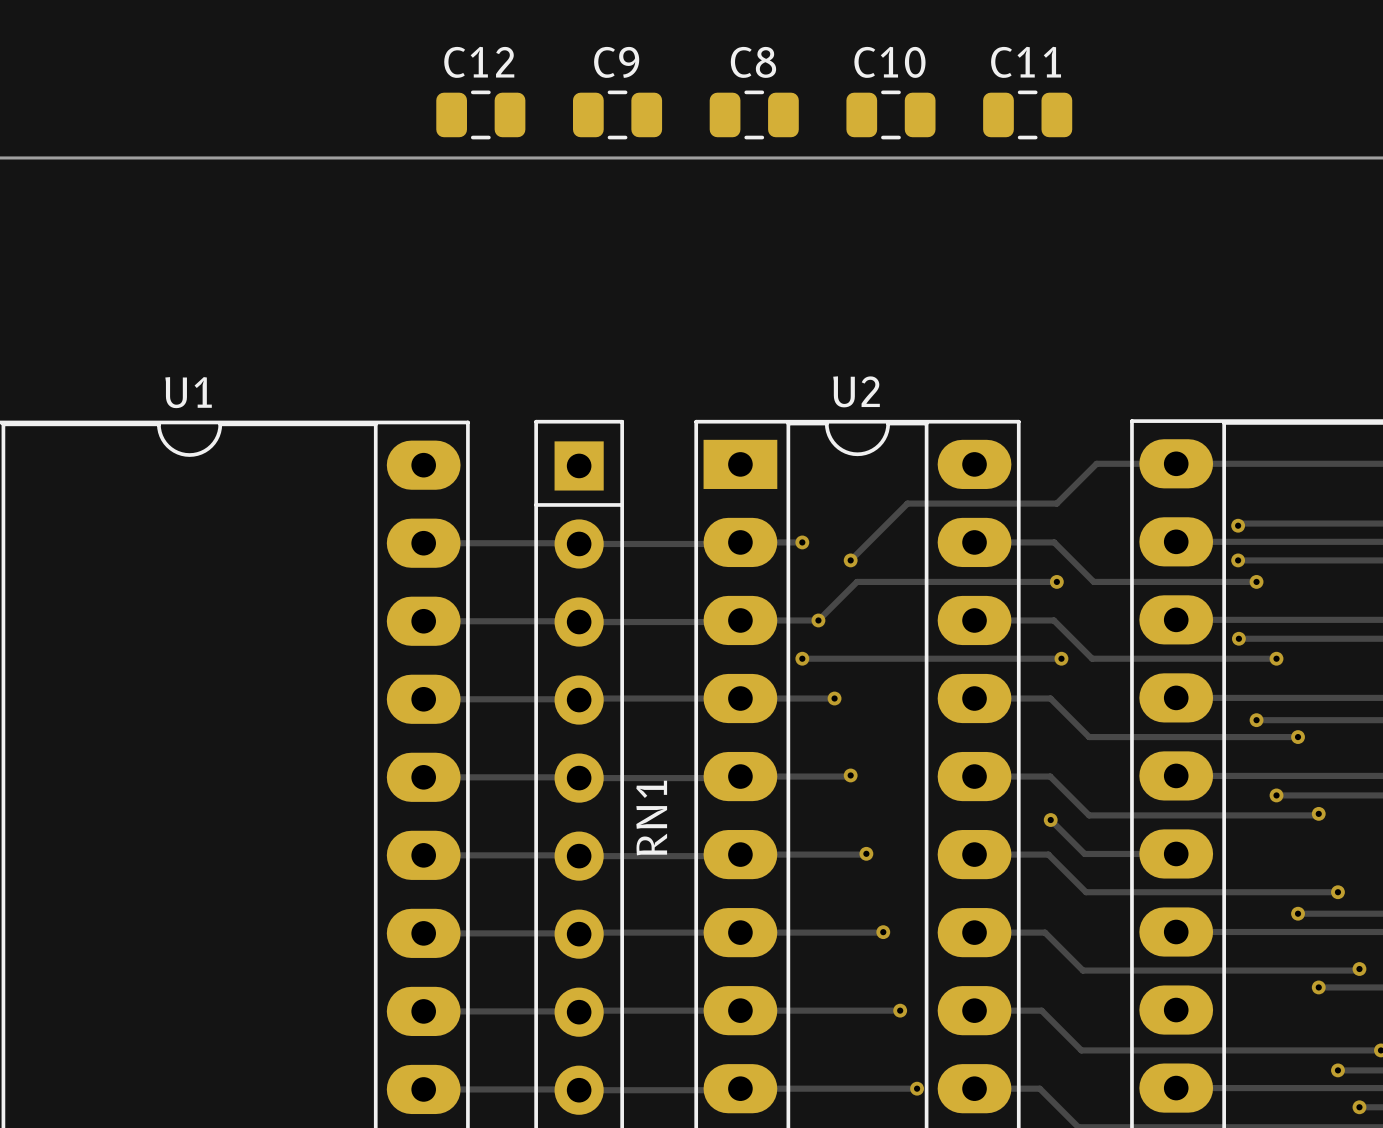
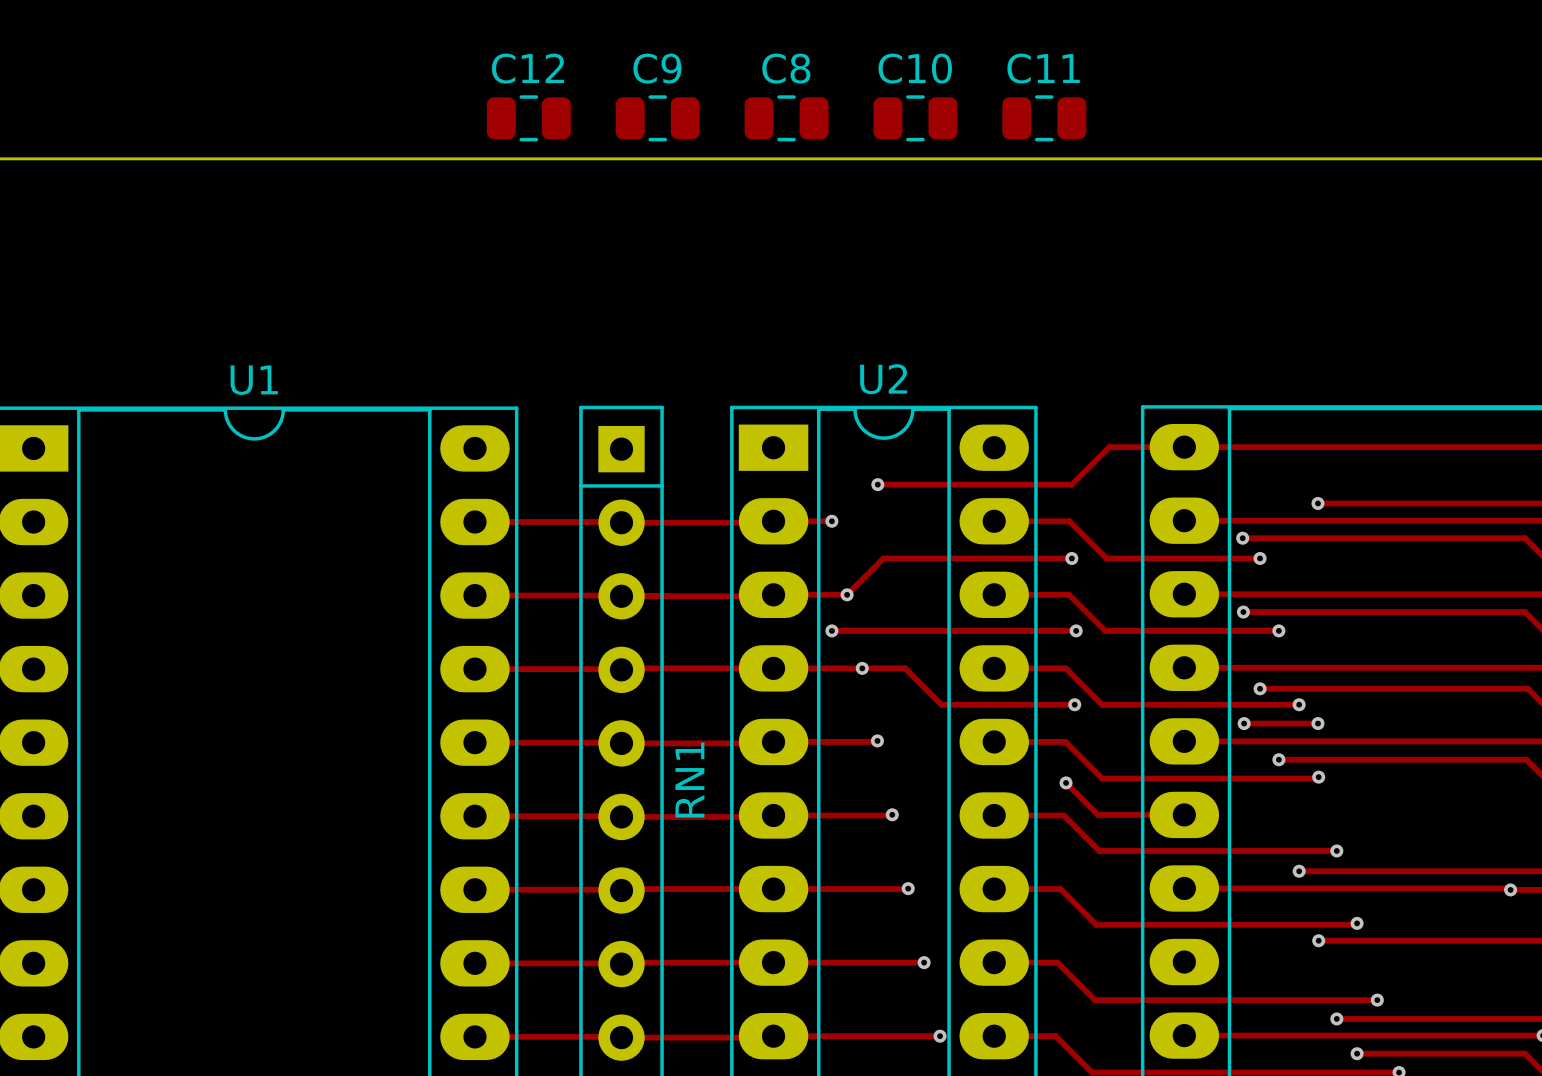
track: (907, 503) (850, 560) -> (931, 484) (877, 484)
track: (1318, 523) (1240, 523) (1238, 525) -> none
via position: (1238, 525) -> (1317, 503)
via position: (850, 560) -> (877, 484)
track: none -> (862, 668) (905, 668) (941, 704) (1074, 704)
via: none -> (1074, 704)
track: none -> (1244, 723) (1317, 723)
via: none -> (1244, 723)
via: none -> (1317, 723)

